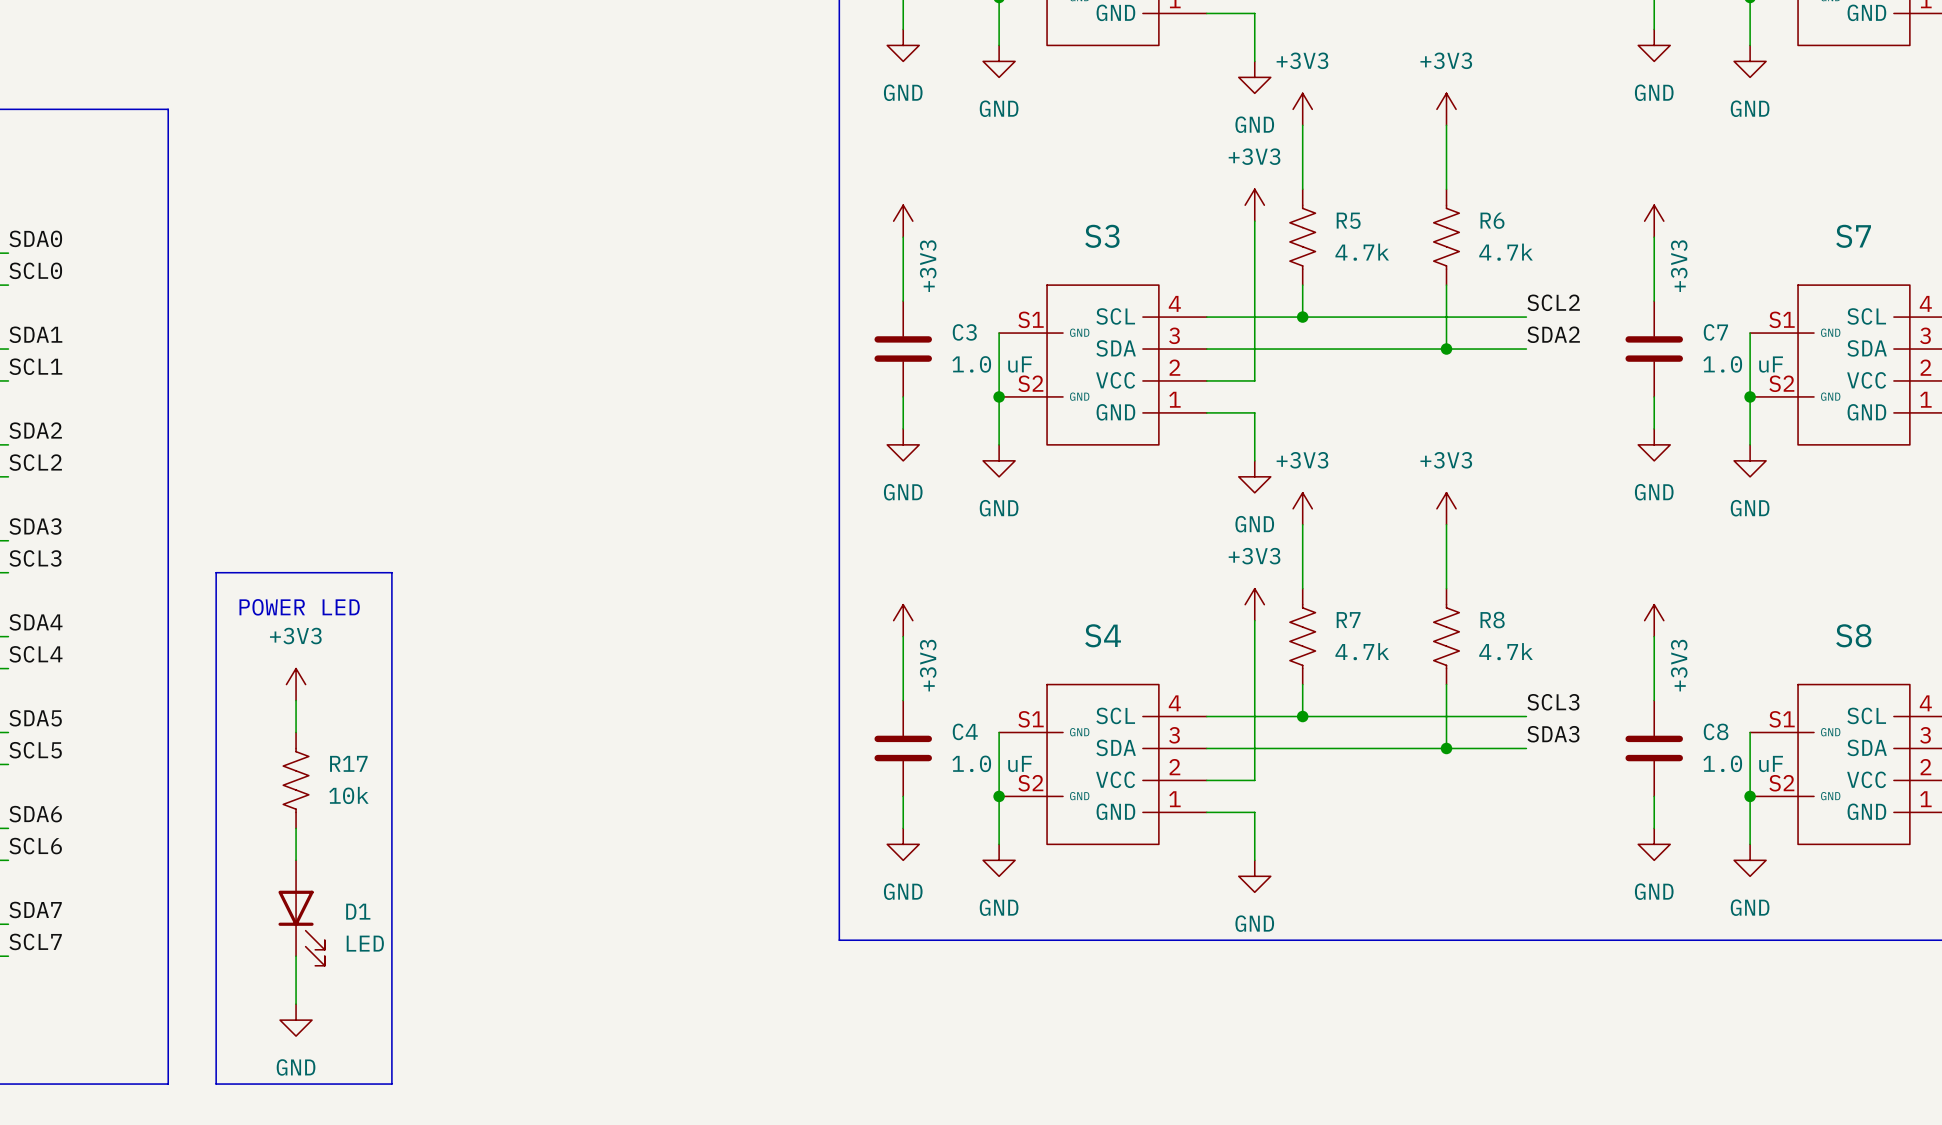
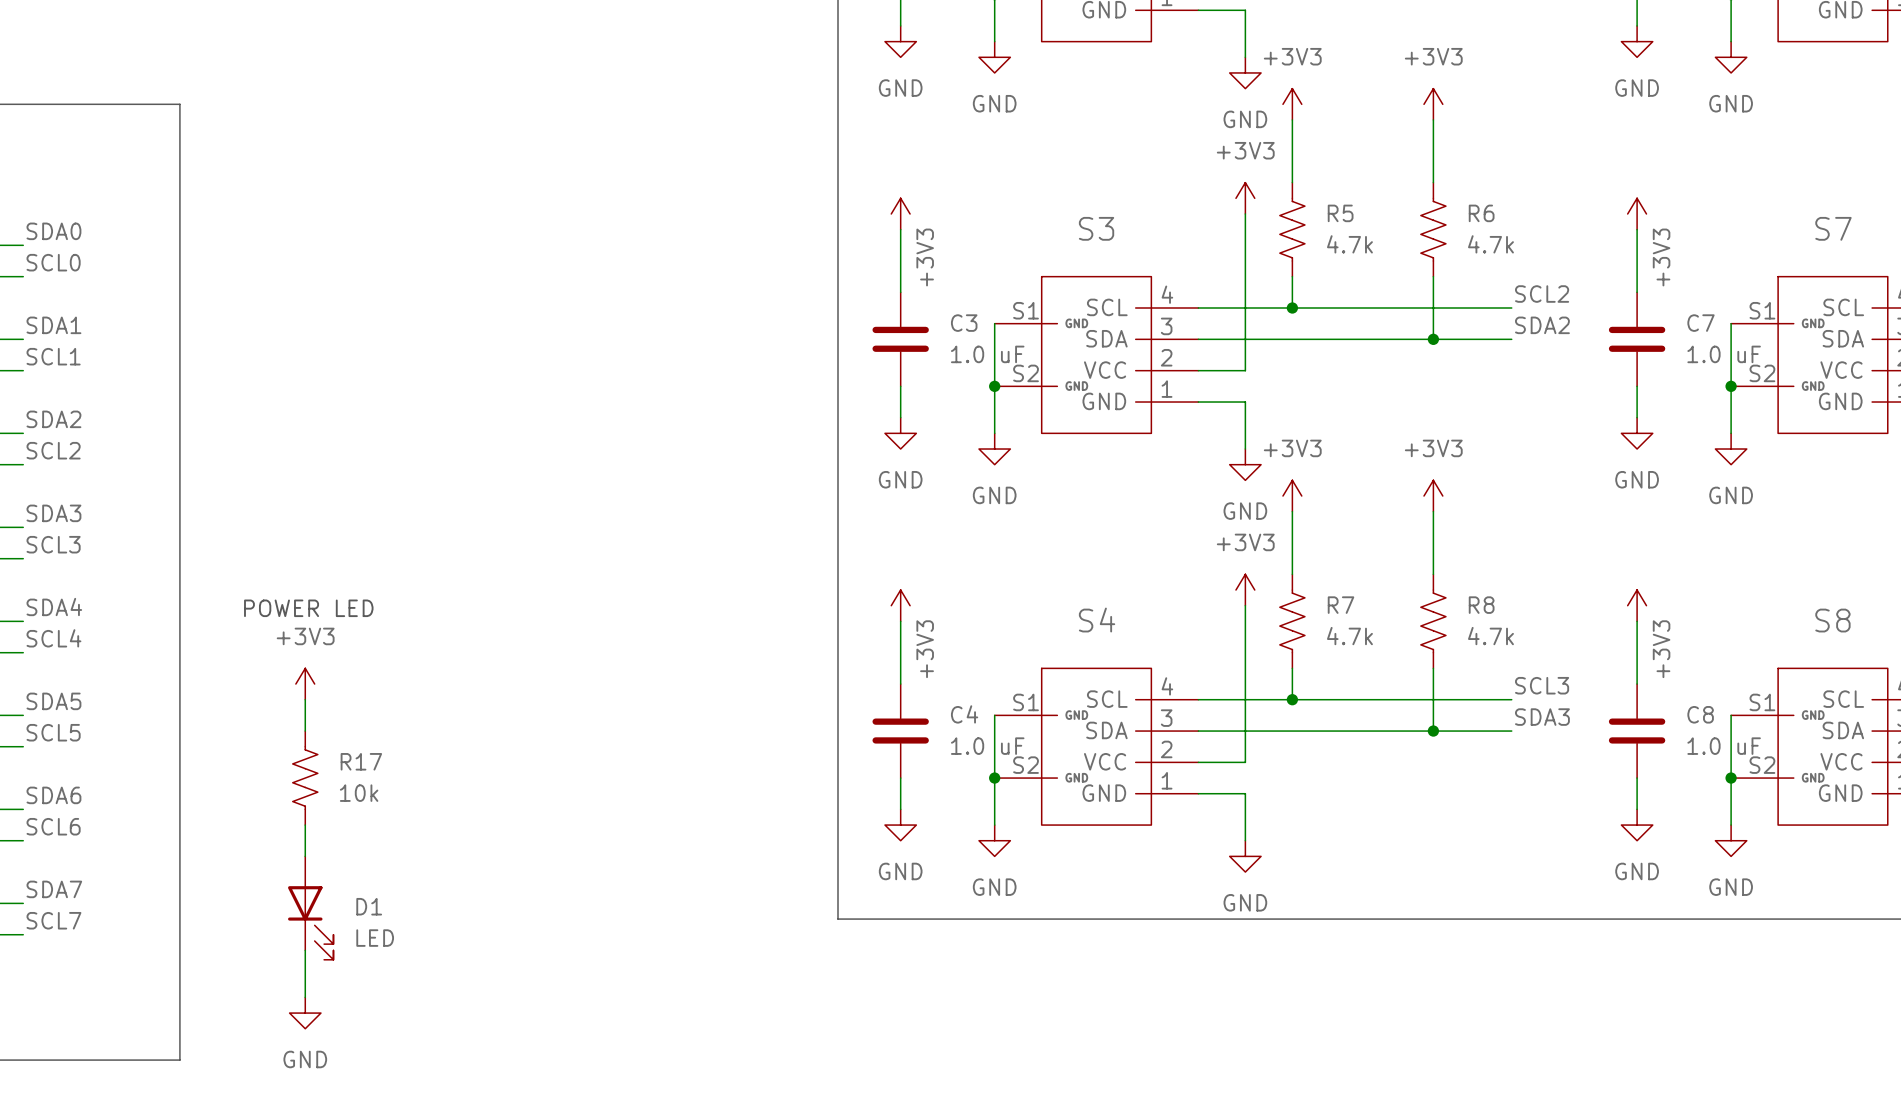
line: (216, 572) (391, 572) (391, 1084) (216, 1084) (216, 572) -> none
text position: POWER LED (299, 607) -> POWER LED (308, 608)
power symbol position: +3V3 (296, 684) -> +3V3 (305, 684)
R17 position: (296, 780) -> (305, 778)
D1 position: (301, 913) -> (310, 908)
power symbol position: GND (296, 1020) -> GND (305, 1013)

